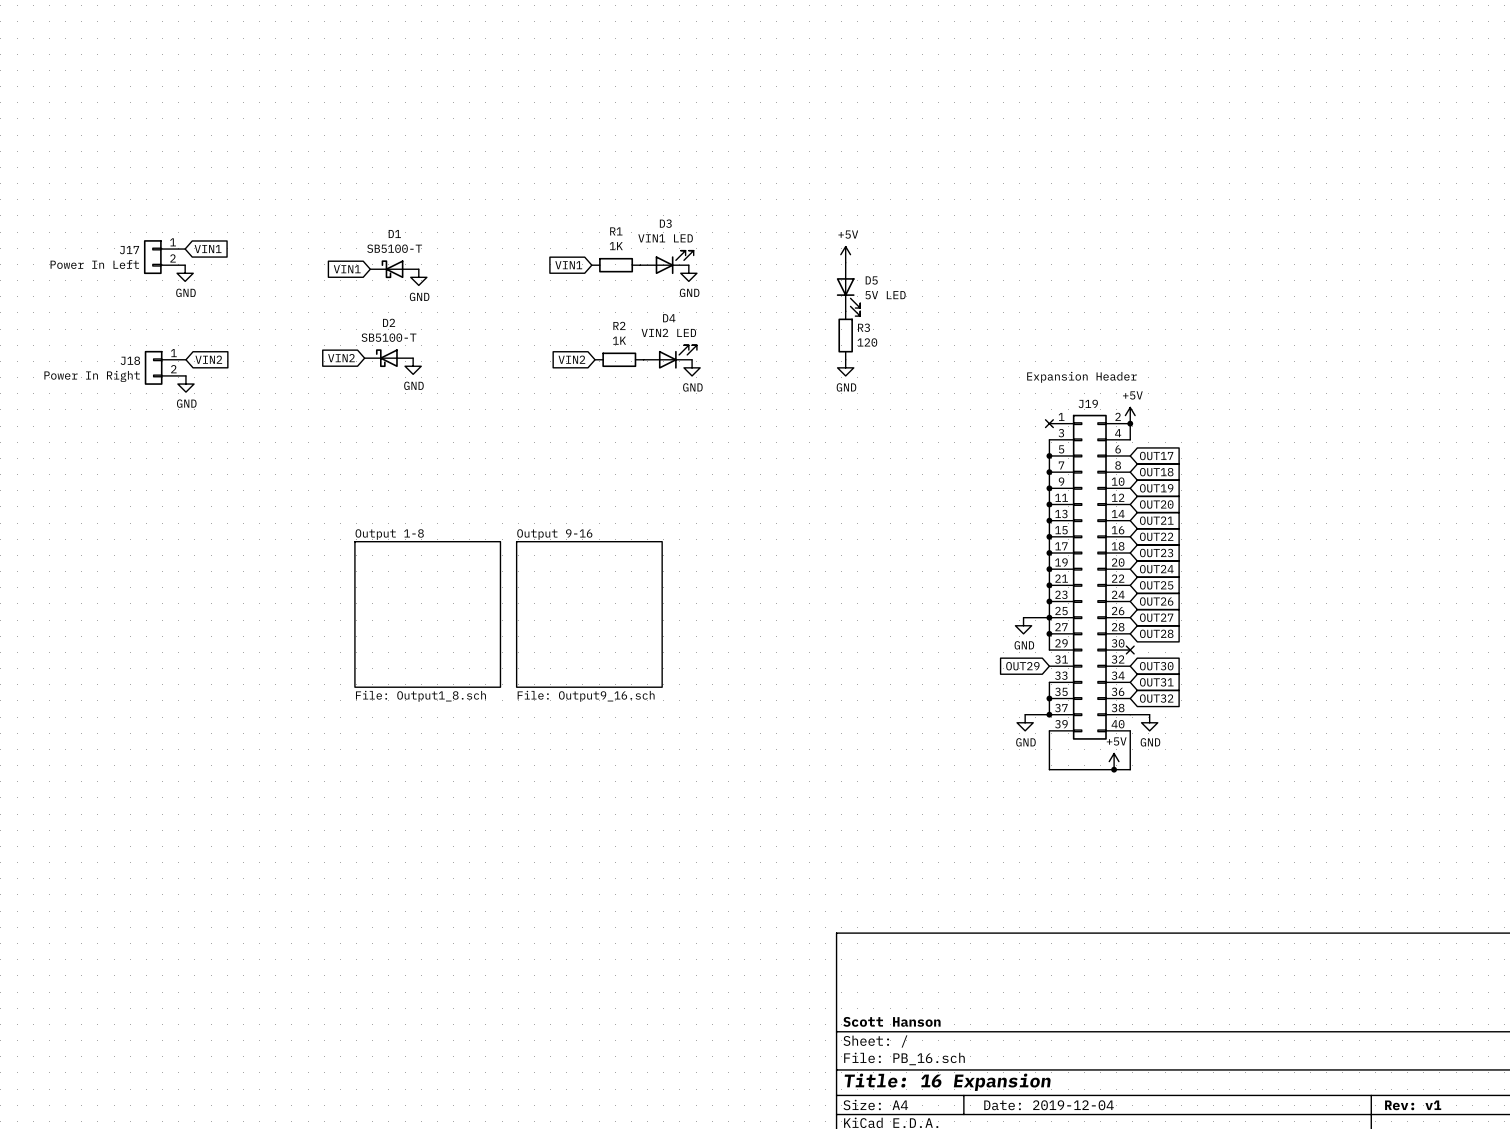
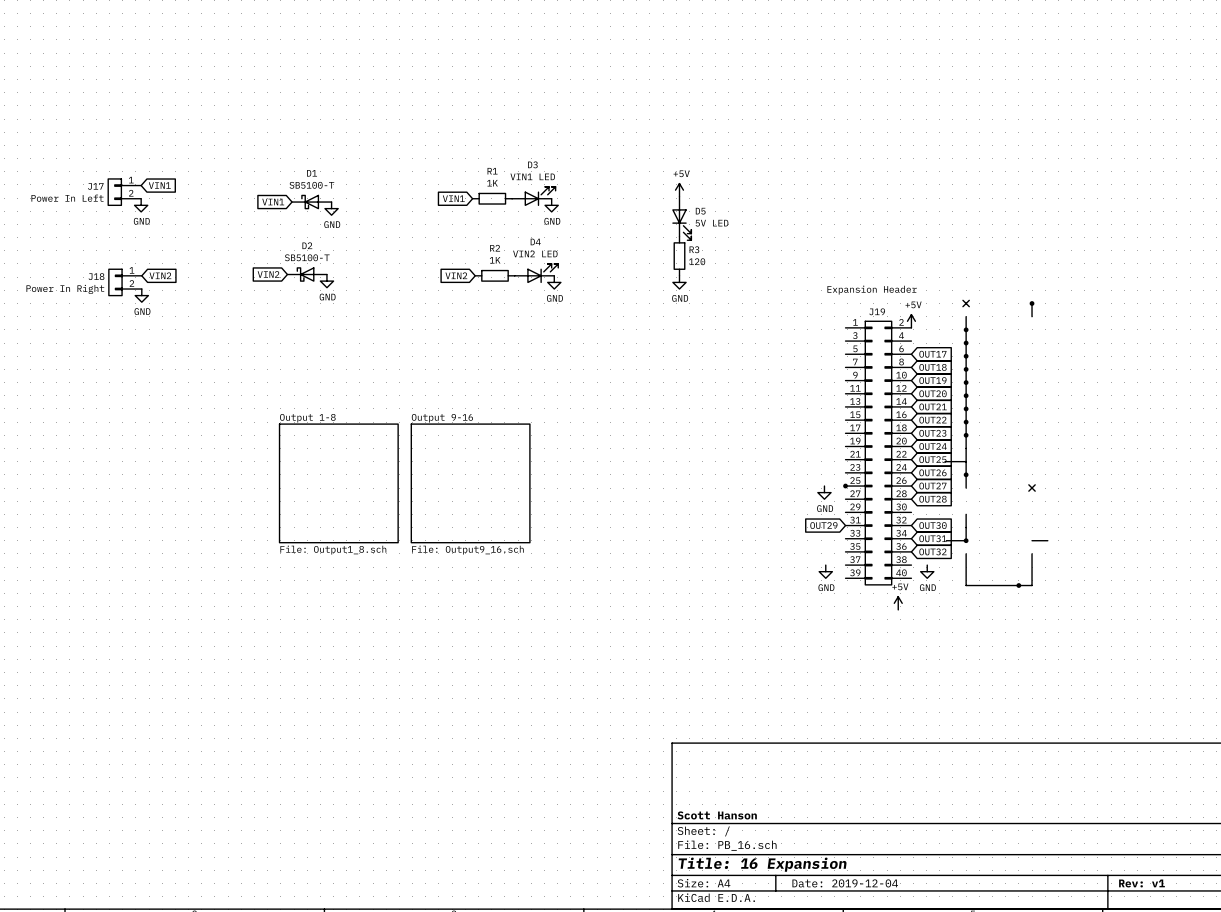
no-connect mark: none -> (966, 303)
junction: none -> (1032, 303)
no-connect mark: (1049, 423) -> none
wire: (1130, 423) (1130, 439) -> (1032, 303) (1032, 316)
junction: (1130, 423) -> none
junction: none -> (966, 329)
wire: (1049, 439) (1049, 650) -> (966, 316) (966, 488)
junction: none -> (966, 343)
junction: (1049, 455) -> none
junction: none -> (966, 356)
junction: (1049, 472) -> none
junction: none -> (966, 369)
junction: (1049, 488) -> none
junction: none -> (966, 382)
junction: (1049, 504) -> none
junction: none -> (966, 395)
junction: (1049, 520) -> none
junction: none -> (966, 408)
junction: (1049, 536) -> none
junction: none -> (966, 422)
junction: (1049, 553) -> none
junction: none -> (966, 435)
junction: (1049, 569) -> none
junction: (1049, 585) -> none
junction: (1049, 601) -> none
junction: none -> (966, 474)
wire: (1023, 617) (1049, 617) -> (945, 461) (966, 461)
no-connect mark: none -> (1032, 488)
junction: (1049, 633) -> none
no-connect mark: (1130, 650) -> none
wire: (1049, 682) (1049, 714) (1025, 714) -> (966, 514) (966, 540) (946, 540)
junction: none -> (966, 540)
junction: (1049, 698) -> none
junction: (1049, 714) -> none
wire: (1130, 714) (1149, 714) -> (1032, 540) (1047, 540)
wire: (1049, 730) (1049, 769) (1130, 769) (1130, 730) -> (966, 553) (966, 585) (1032, 585) (1032, 553)
junction: none -> (1018, 585)
junction: (1114, 769) -> none

